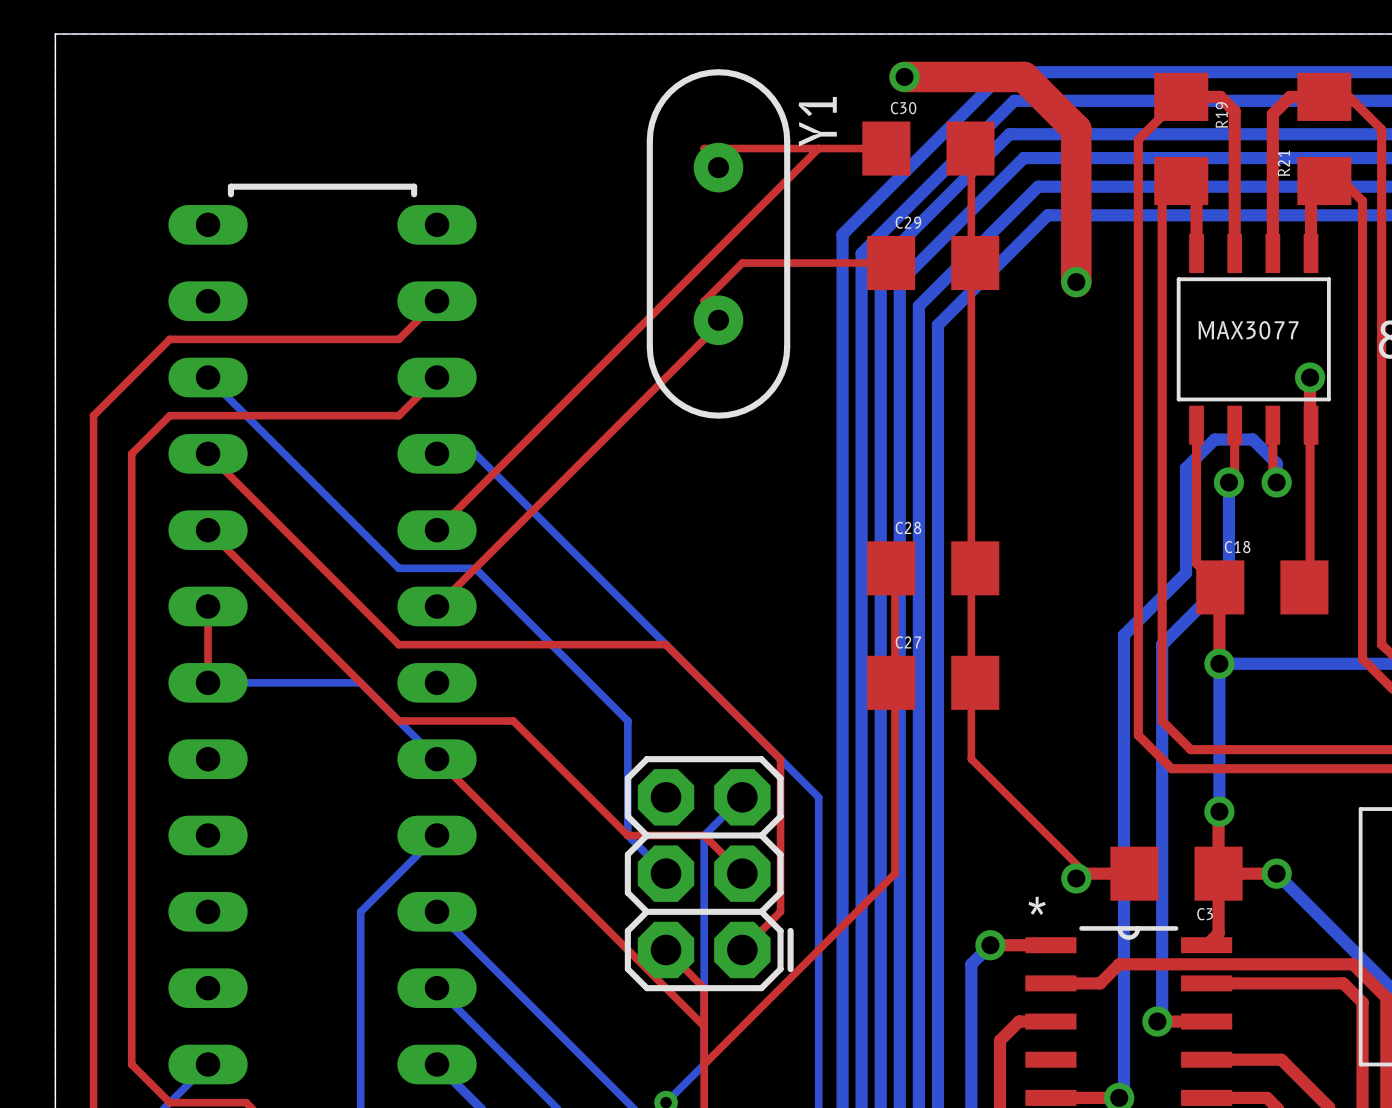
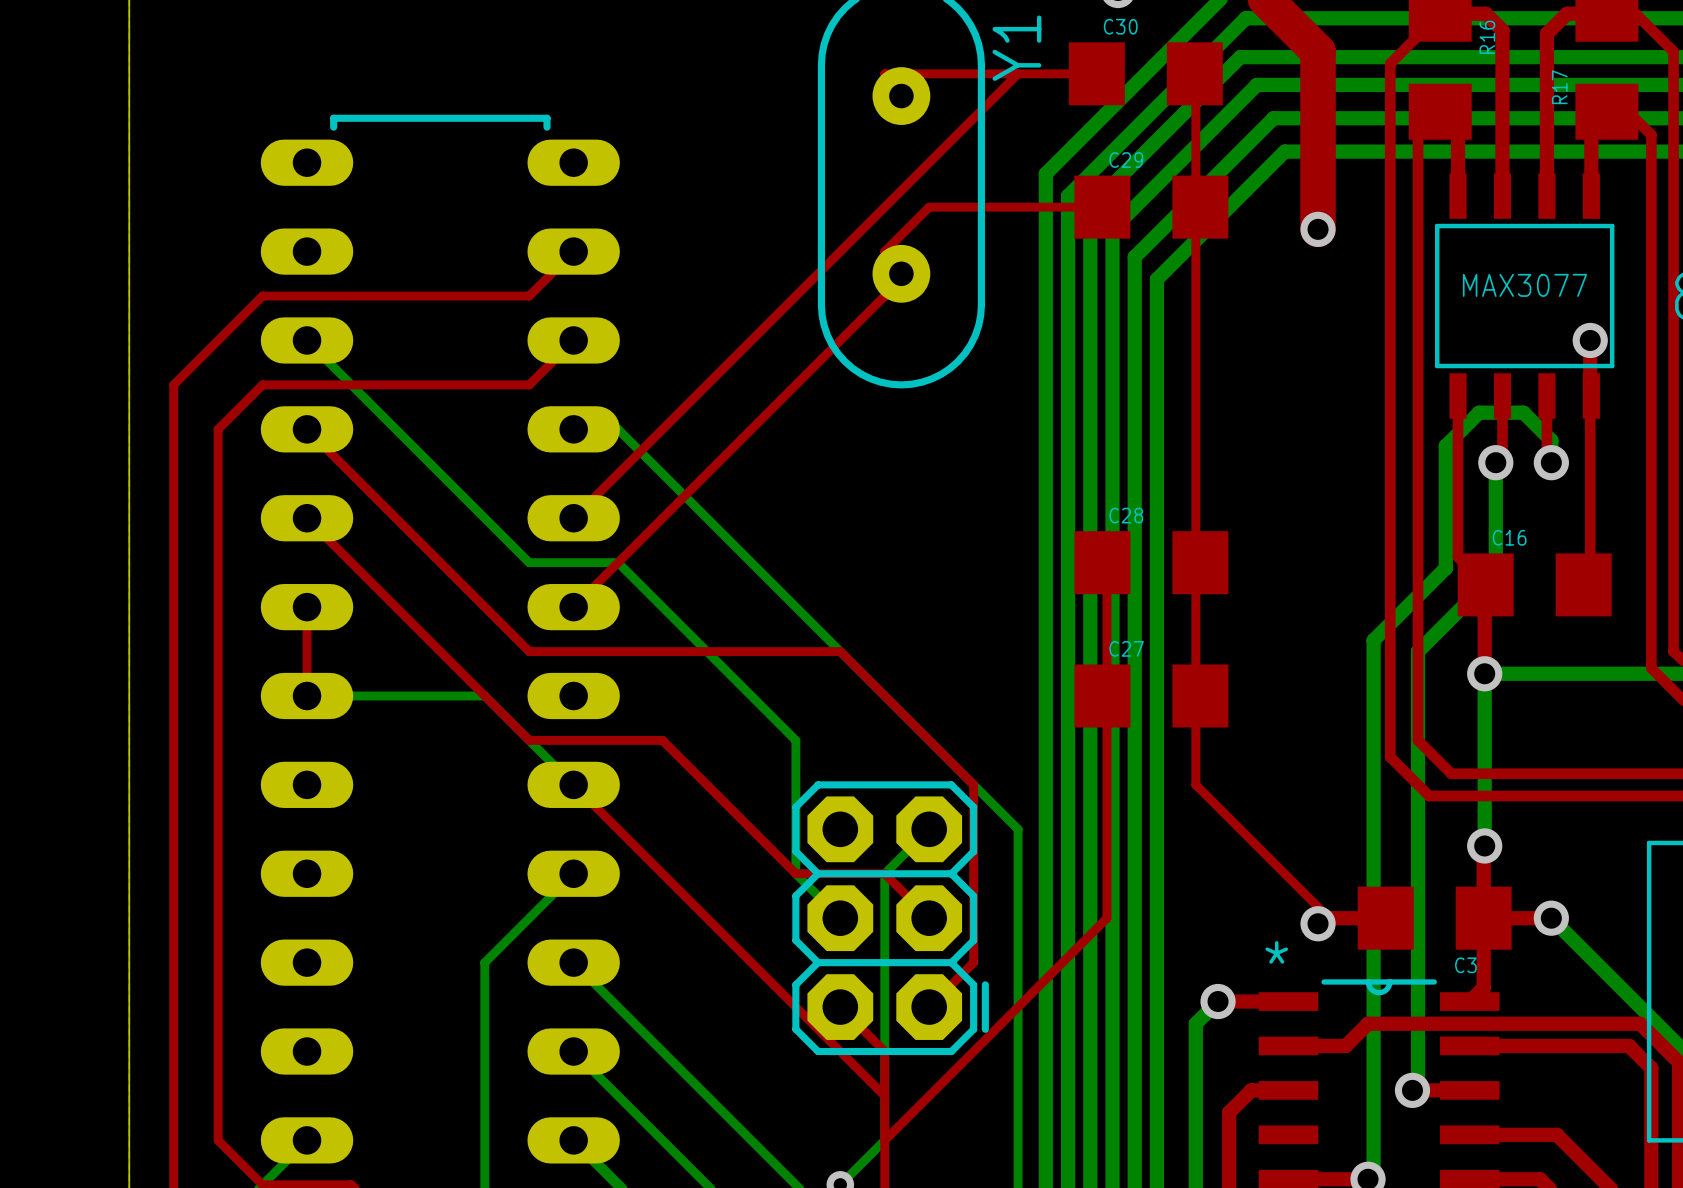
R19 name: R19 (1221, 115) -> R16 (1487, 37)
R21 name: R21 (1283, 163) -> R17 (1559, 87)
C18 name: C18 (1237, 547) -> C16 (1509, 537)

